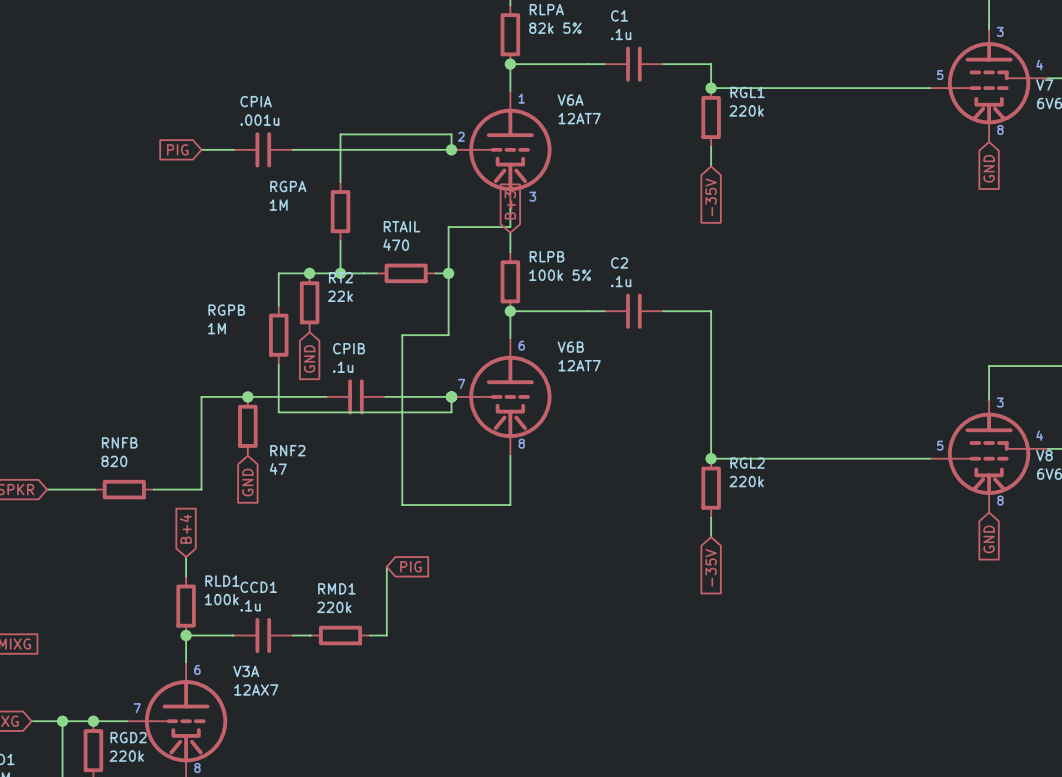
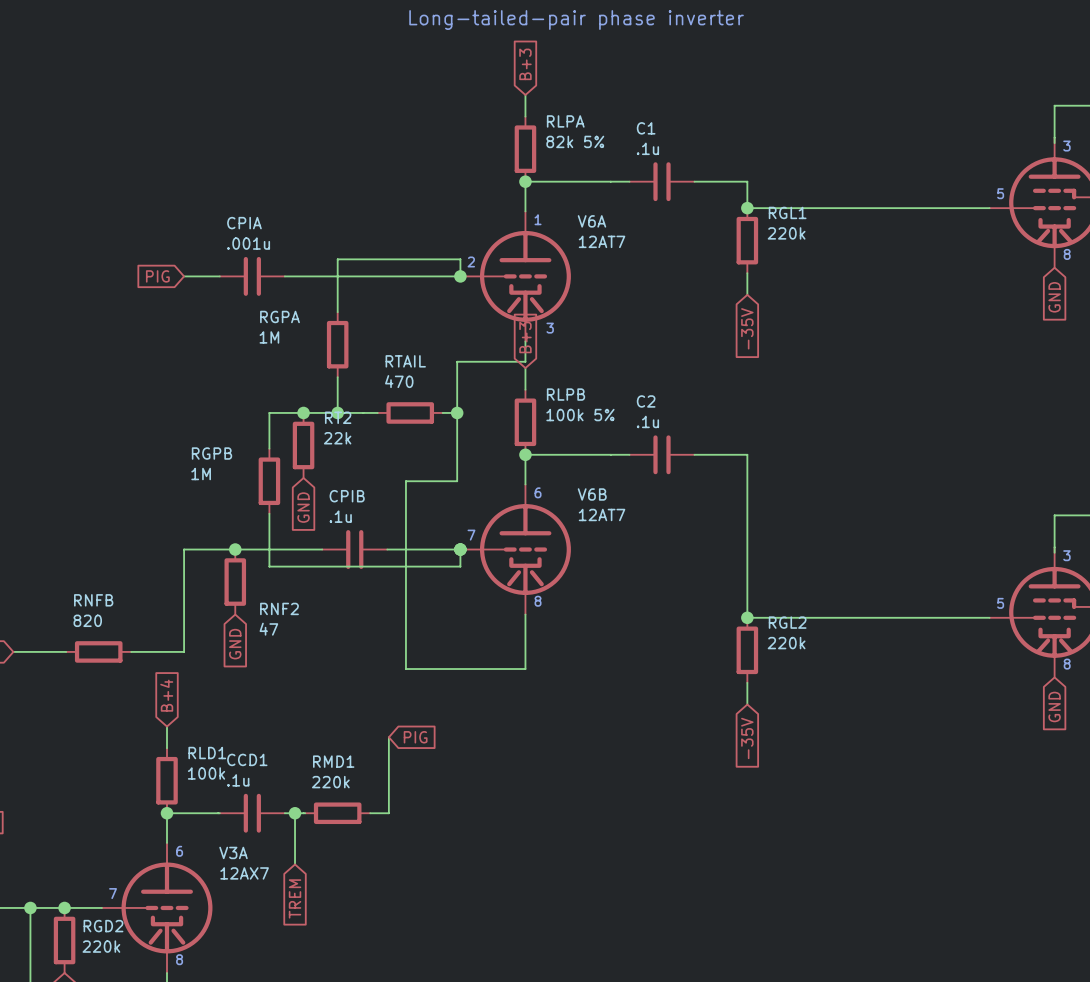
wire: none -> (295, 813) (295, 864)
junction: none -> (295, 813)
global label: none -> TREM (295, 898)

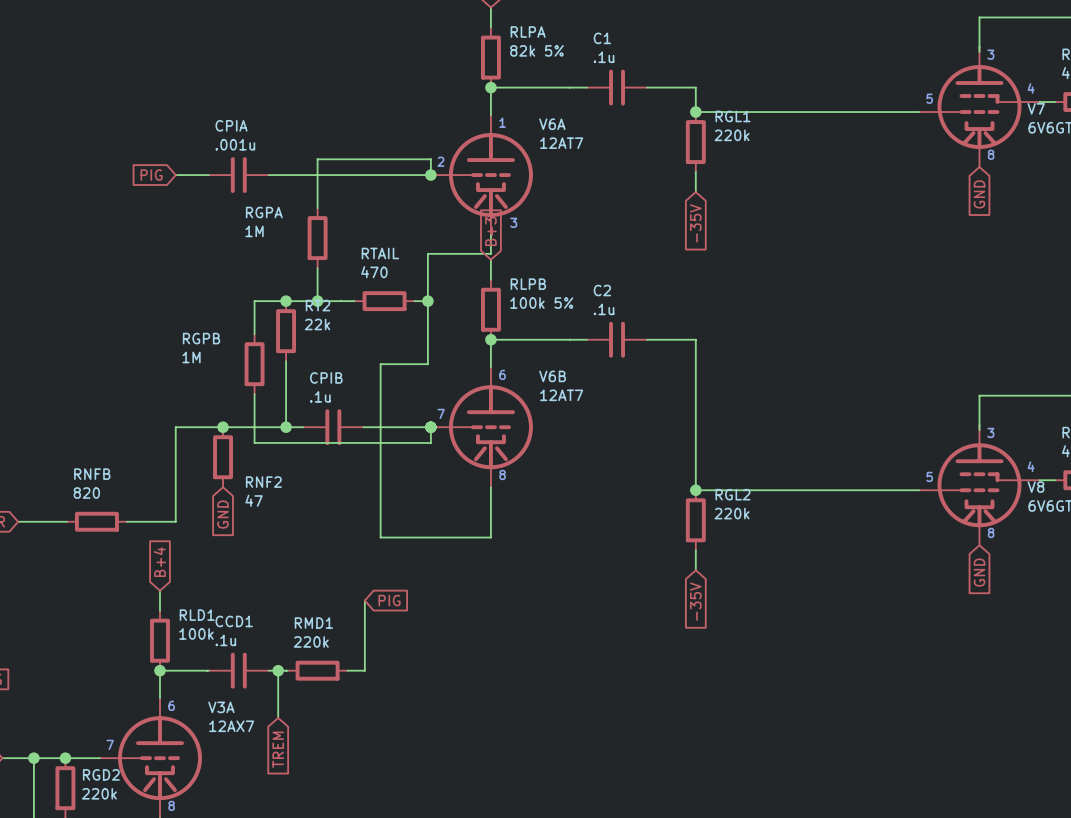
wire: none -> (286, 361) (286, 427)
global label: GND (303, 507) -> none
junction: none -> (286, 427)

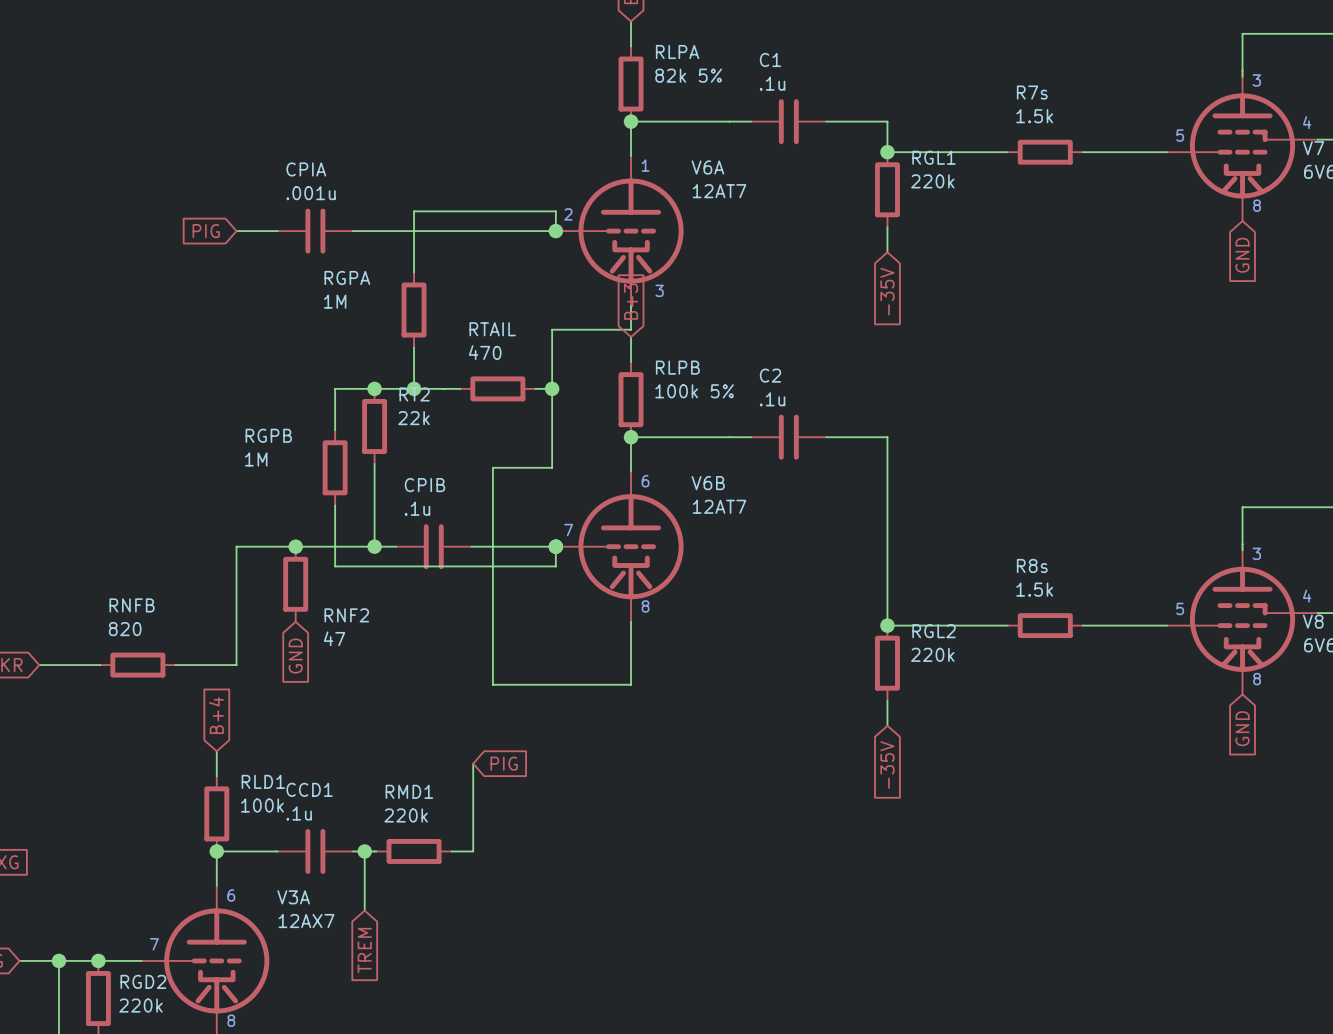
wire: (791, 112) (851, 112) -> none
R7s: none -> 1.5k (1045, 152)
wire: (791, 490) (851, 490) -> none
R8s: none -> 1.5k (1045, 625)

